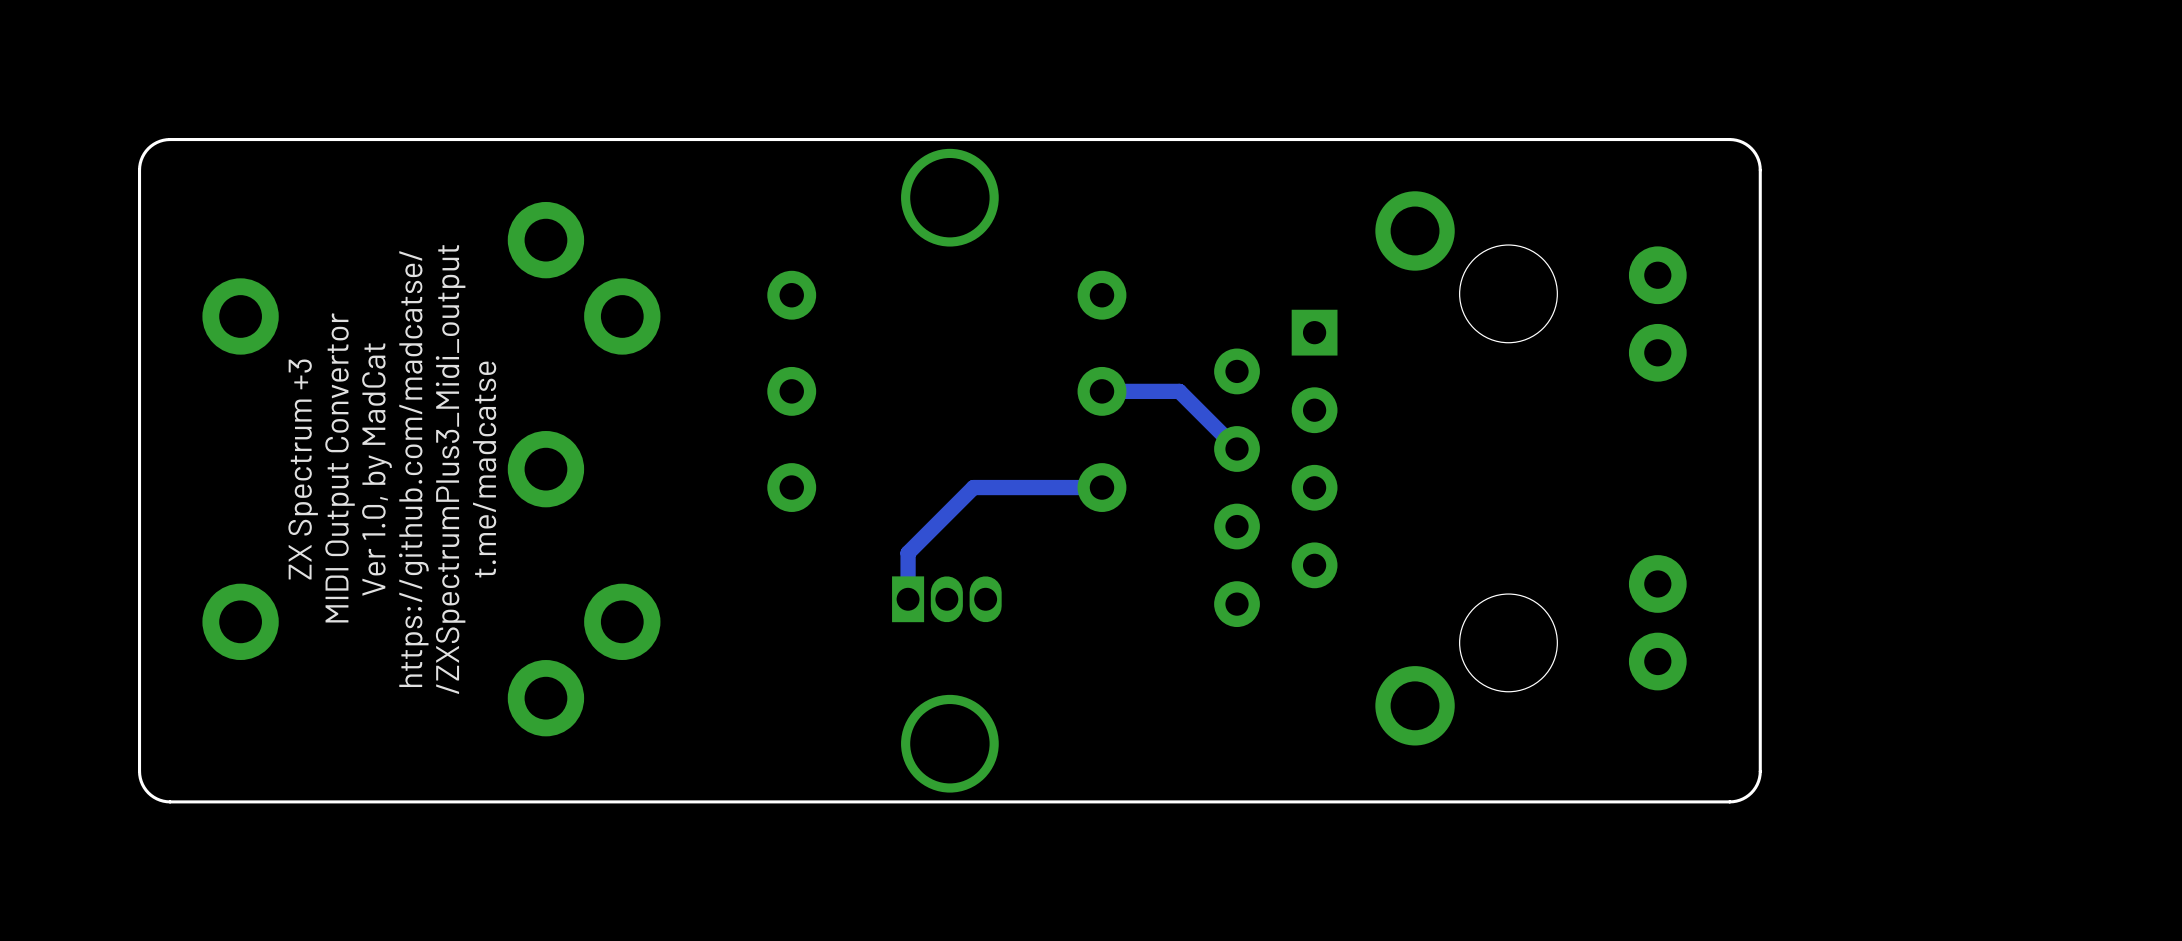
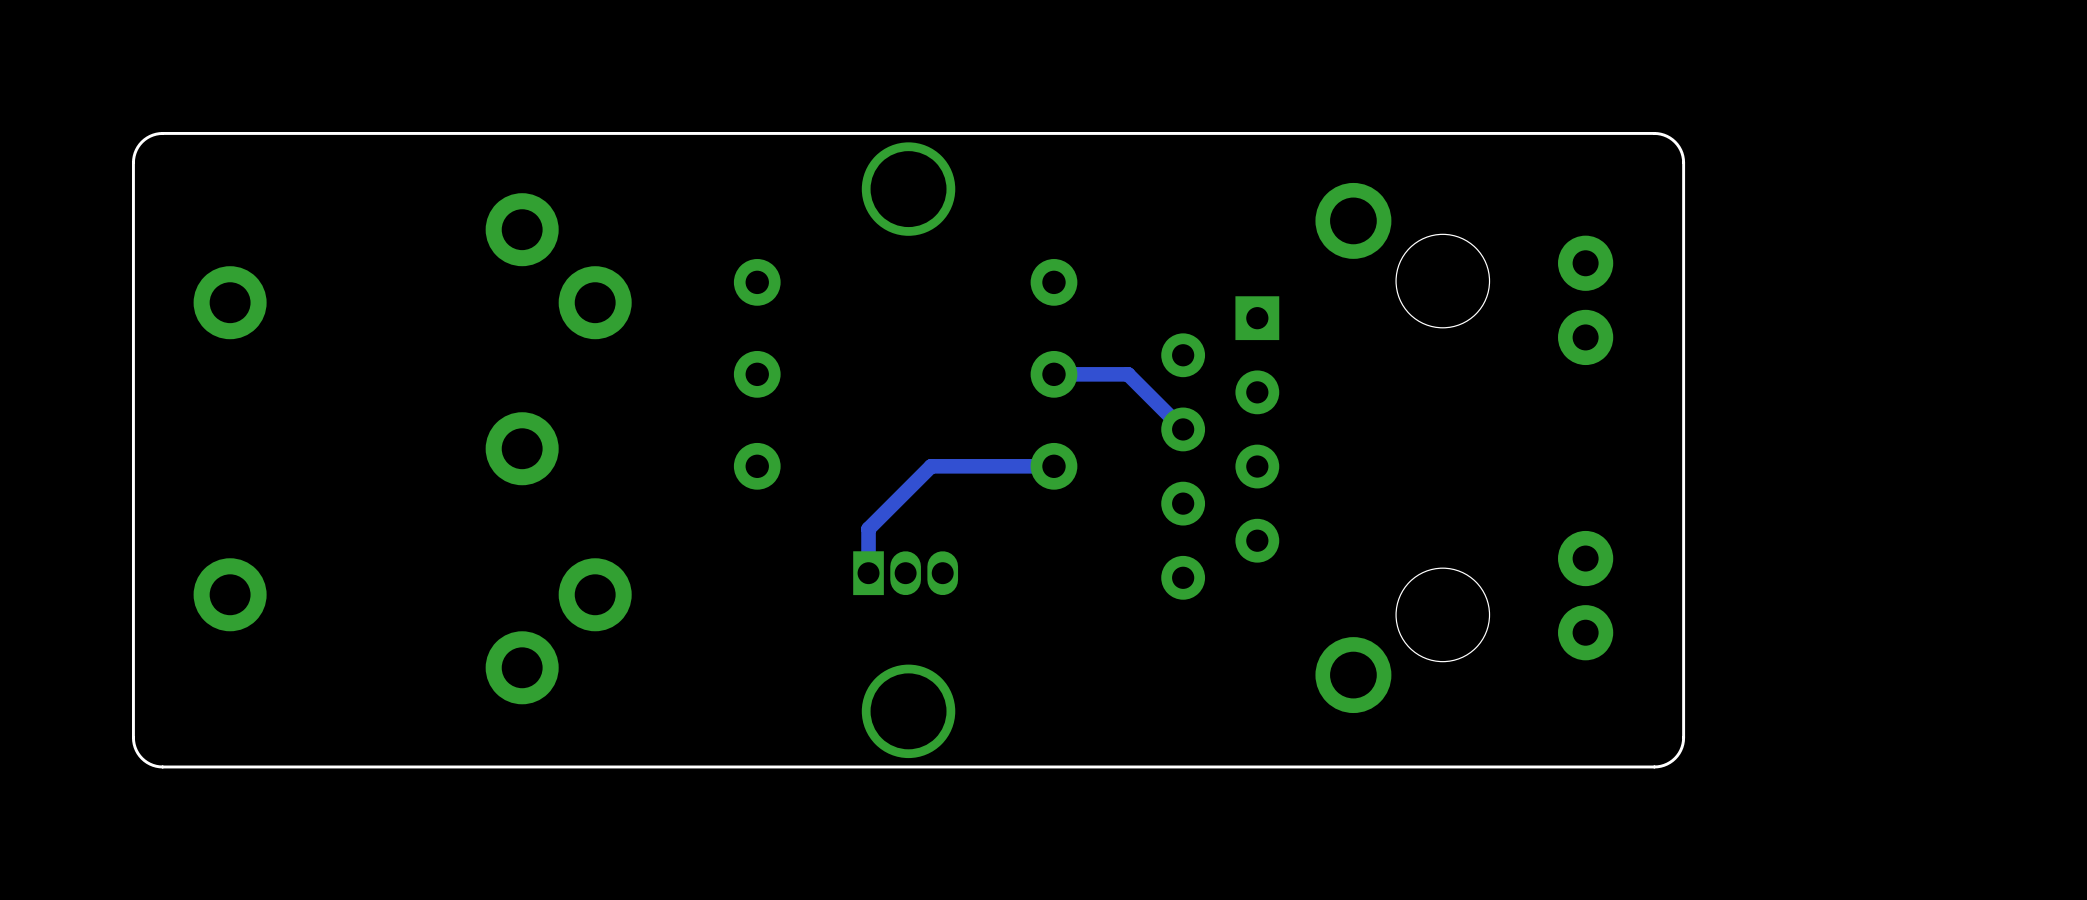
text: MIDI Output Convertor (340, 467) -> none
text: ZX Spectrum +3 (303, 469) -> none
text: Ver 1.0, by MadCat (376, 469) -> none
text: https://github.com/madcatse/ (413, 469) -> none
text: /ZXSpectrumPlus3_Midi_output (450, 469) -> none
text: t.me/madcatse (484, 469) -> none

